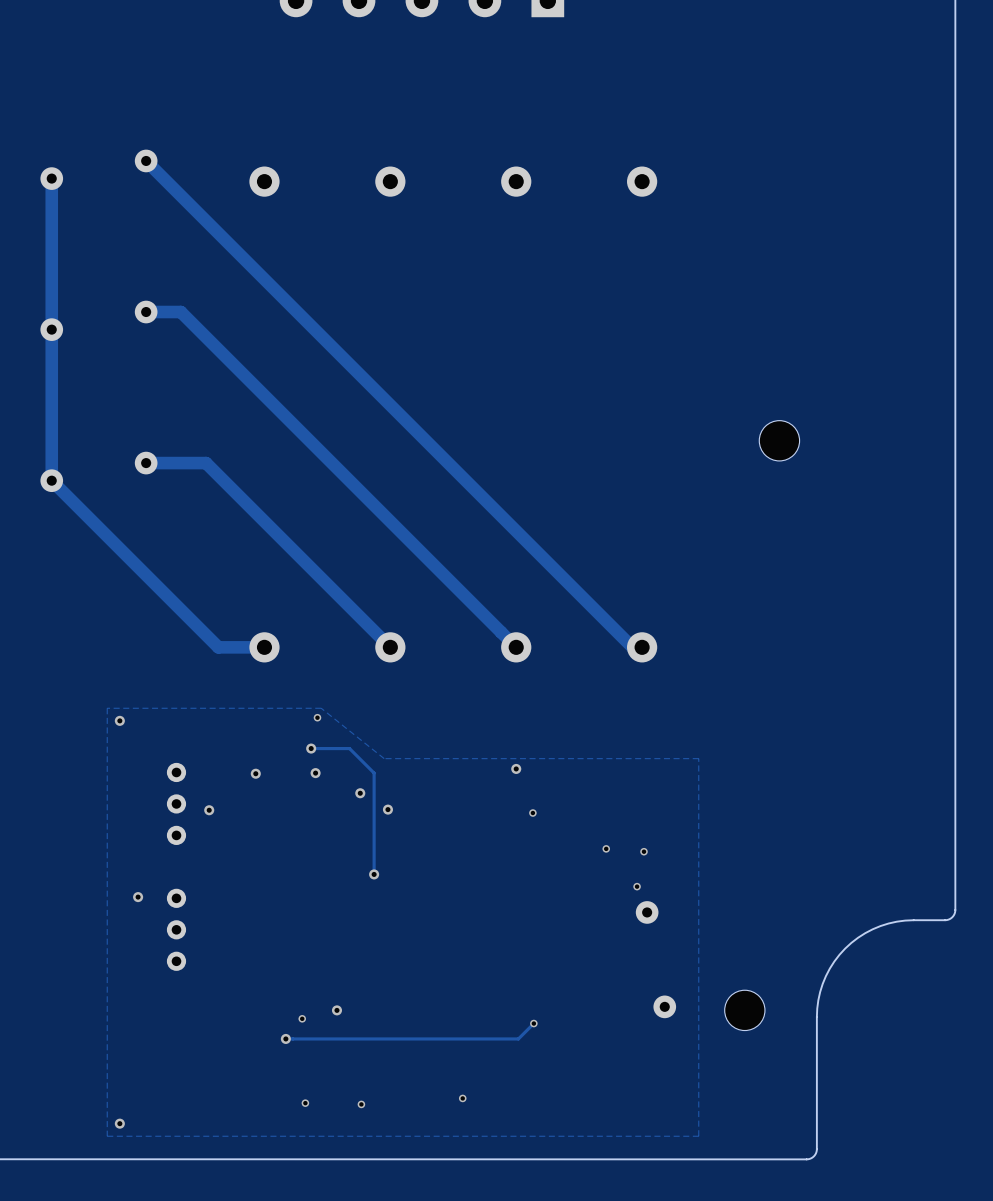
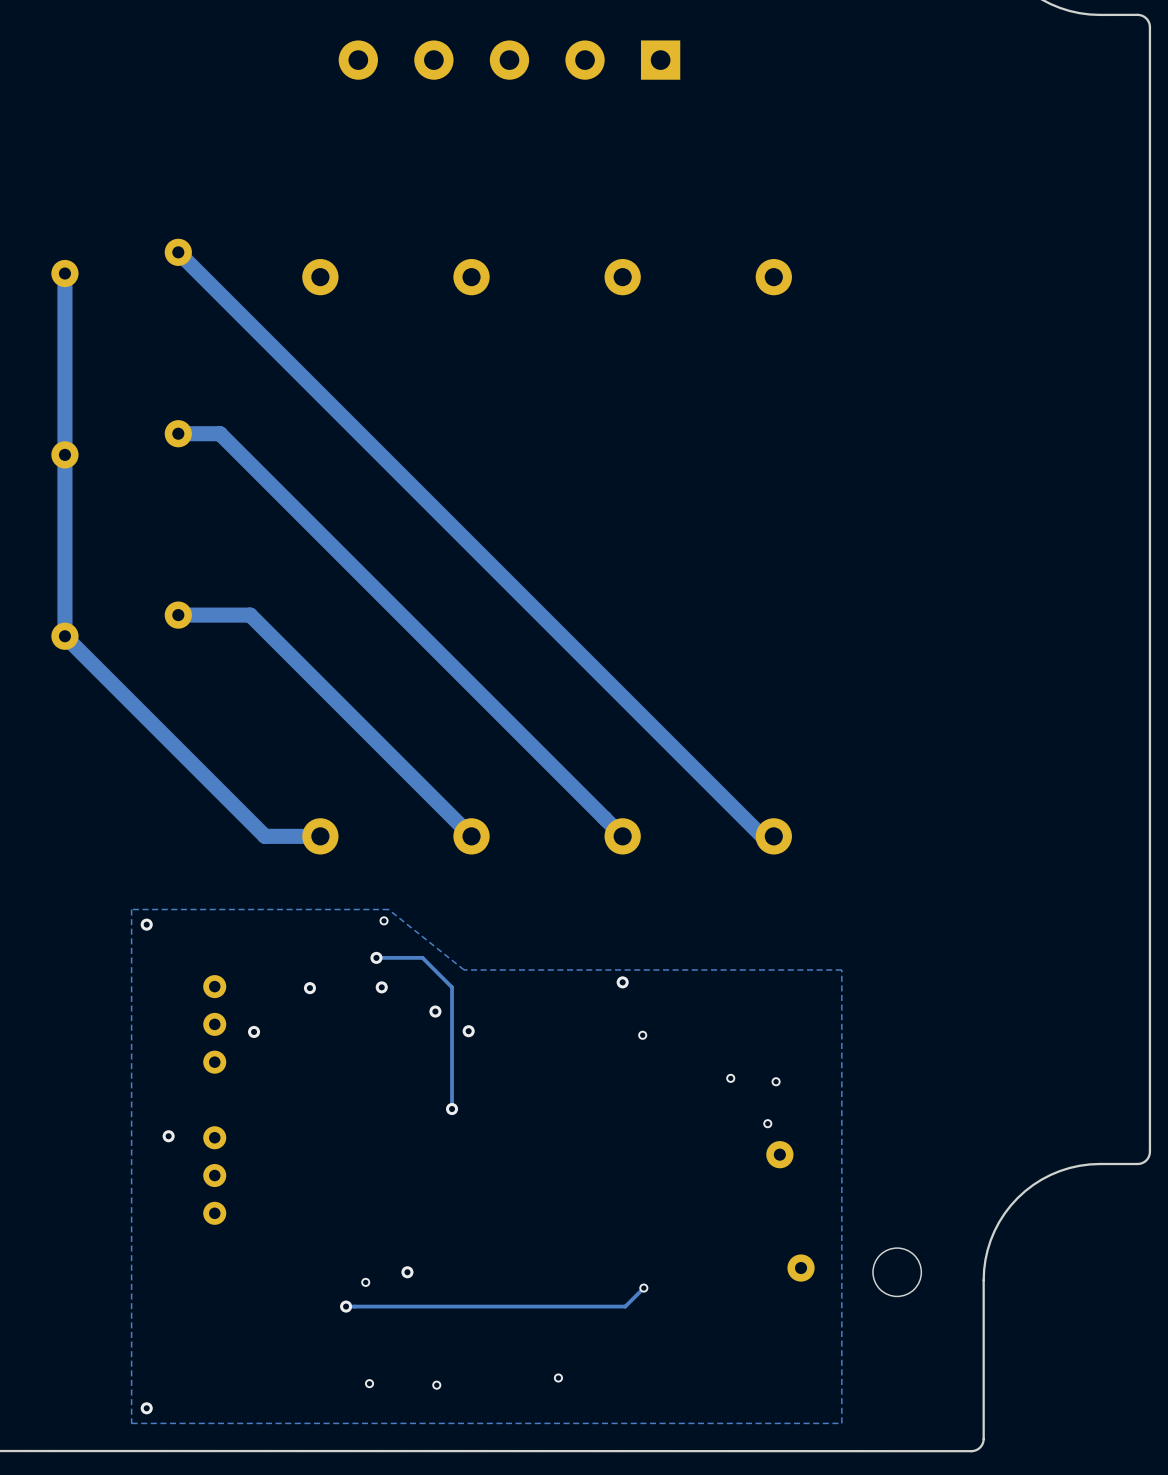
part: (779, 440) -> none

